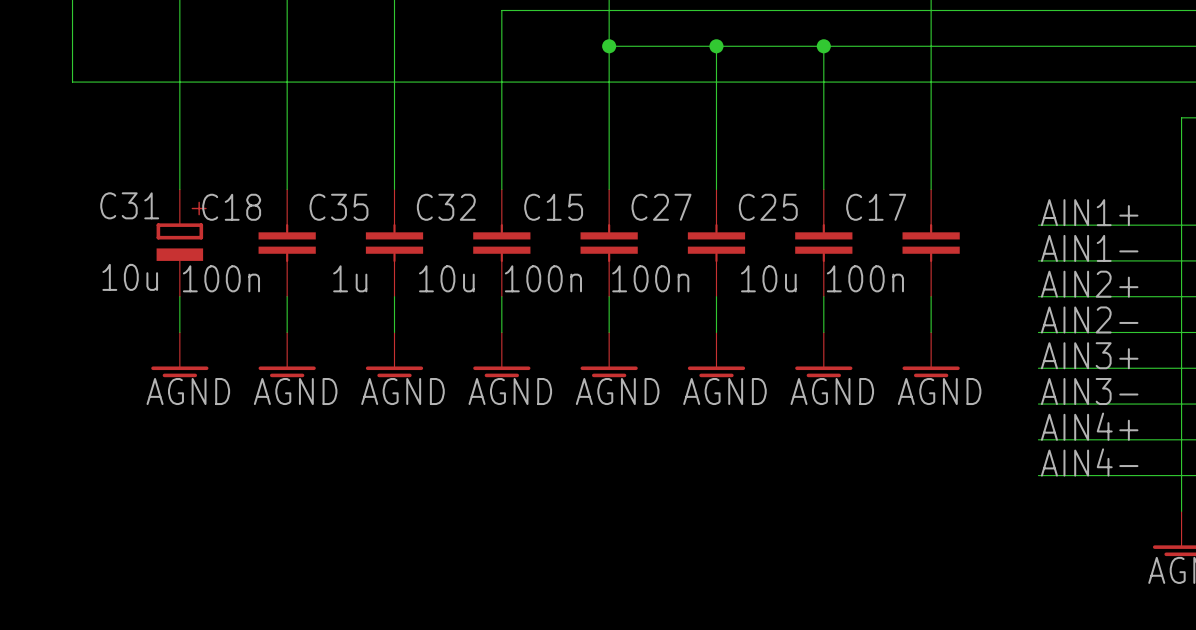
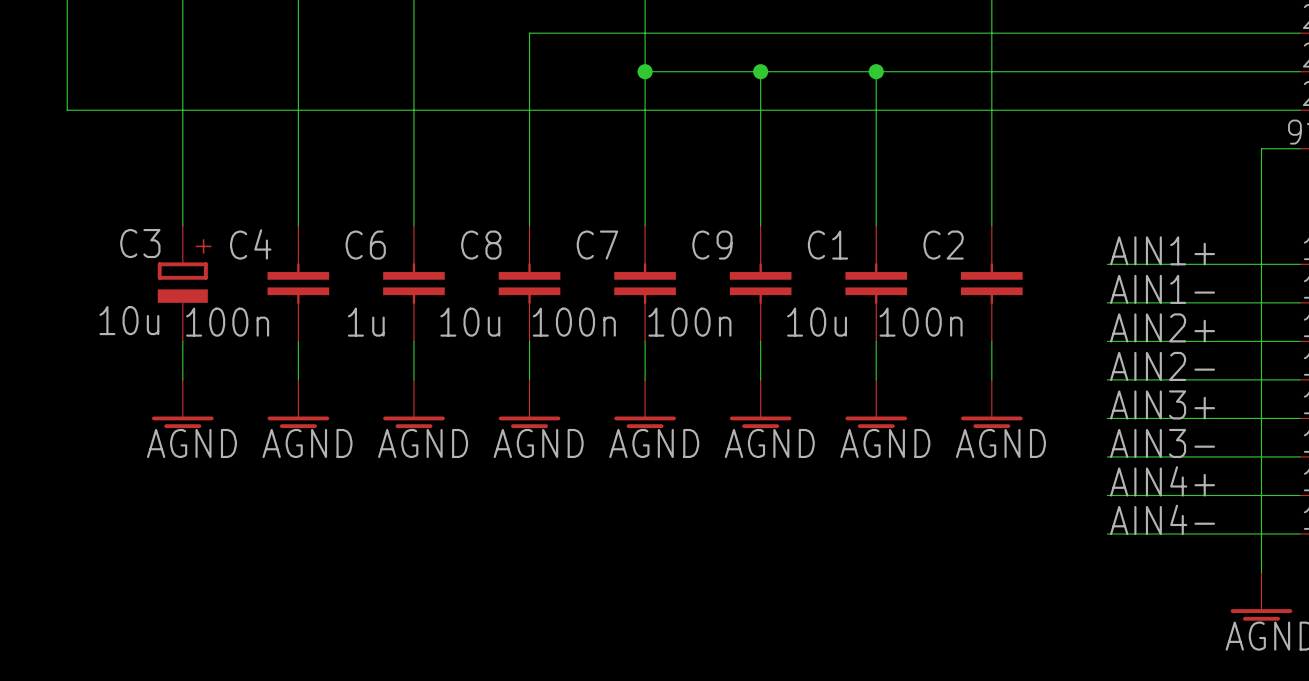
C31 name: C31 (129, 205) -> C3 (140, 243)
C18 name: C18 (231, 207) -> C4 (250, 244)
C35 name: C35 (338, 207) -> C6 (365, 245)
C32 name: C32 (446, 207) -> C8 (481, 245)
C15 name: C15 (553, 207) -> C7 (597, 245)
C27 name: C27 (661, 207) -> C9 (712, 245)
C25 name: C25 (768, 207) -> C1 (828, 245)
C17 name: C17 (876, 207) -> C2 (943, 245)

